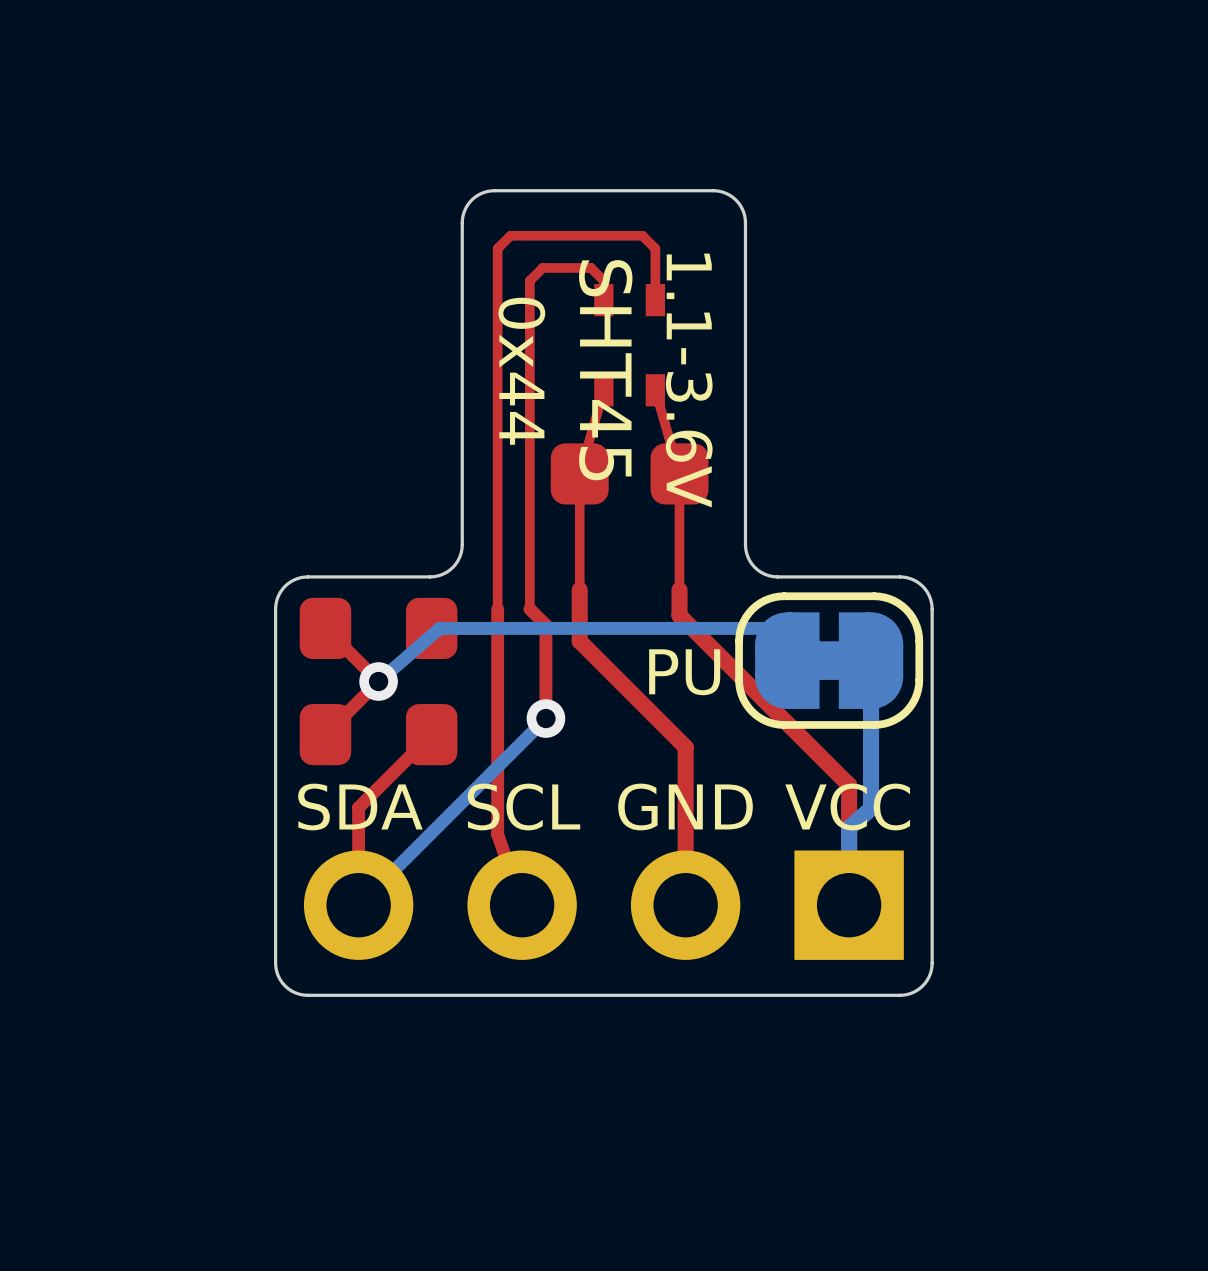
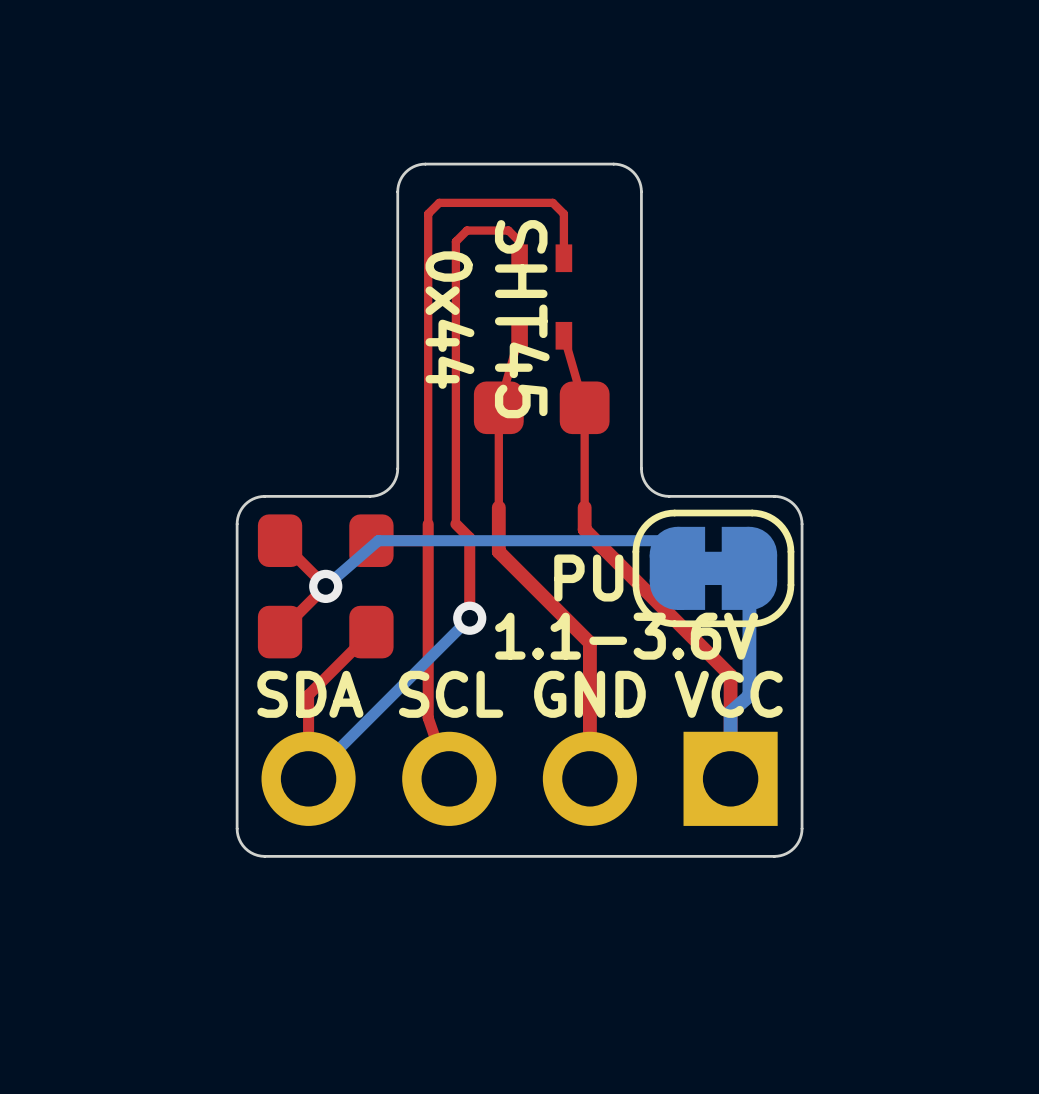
text rotation: 0° (689, 380) -> 90° counterclockwise (626, 636)

